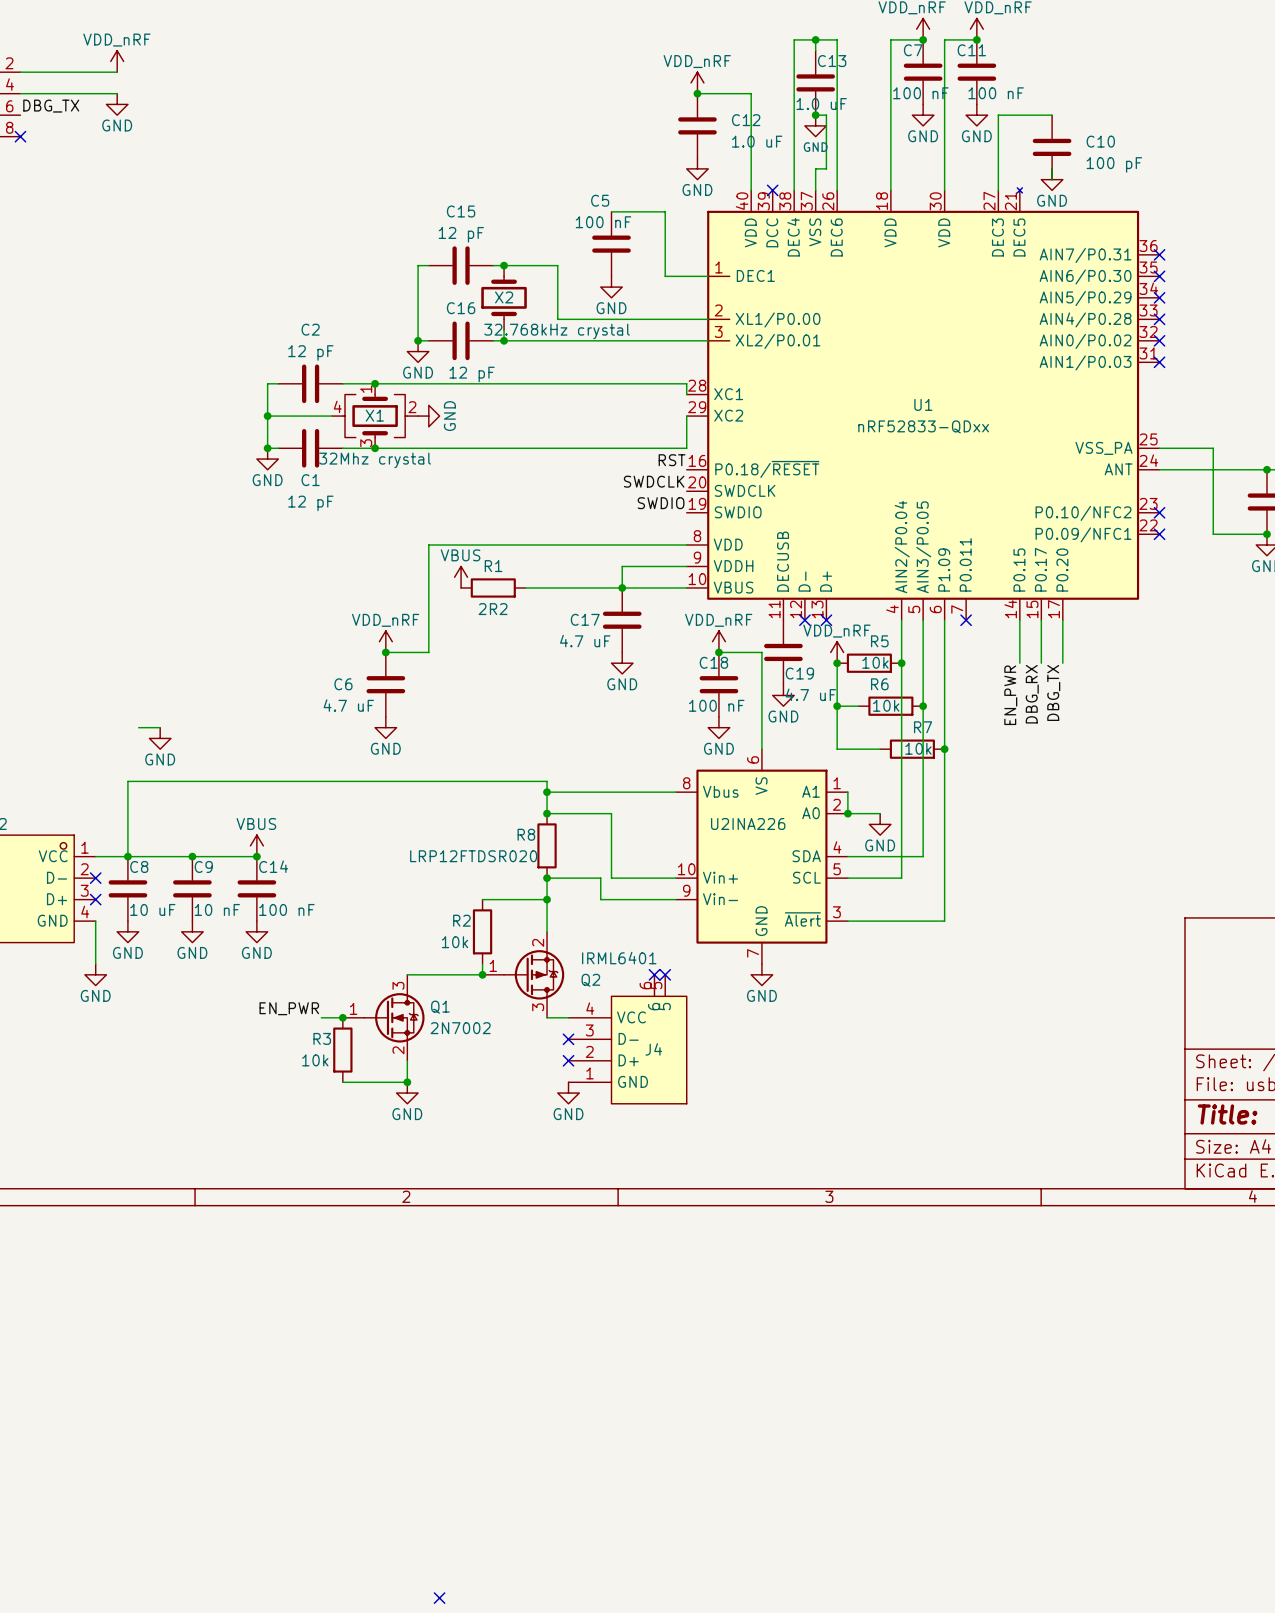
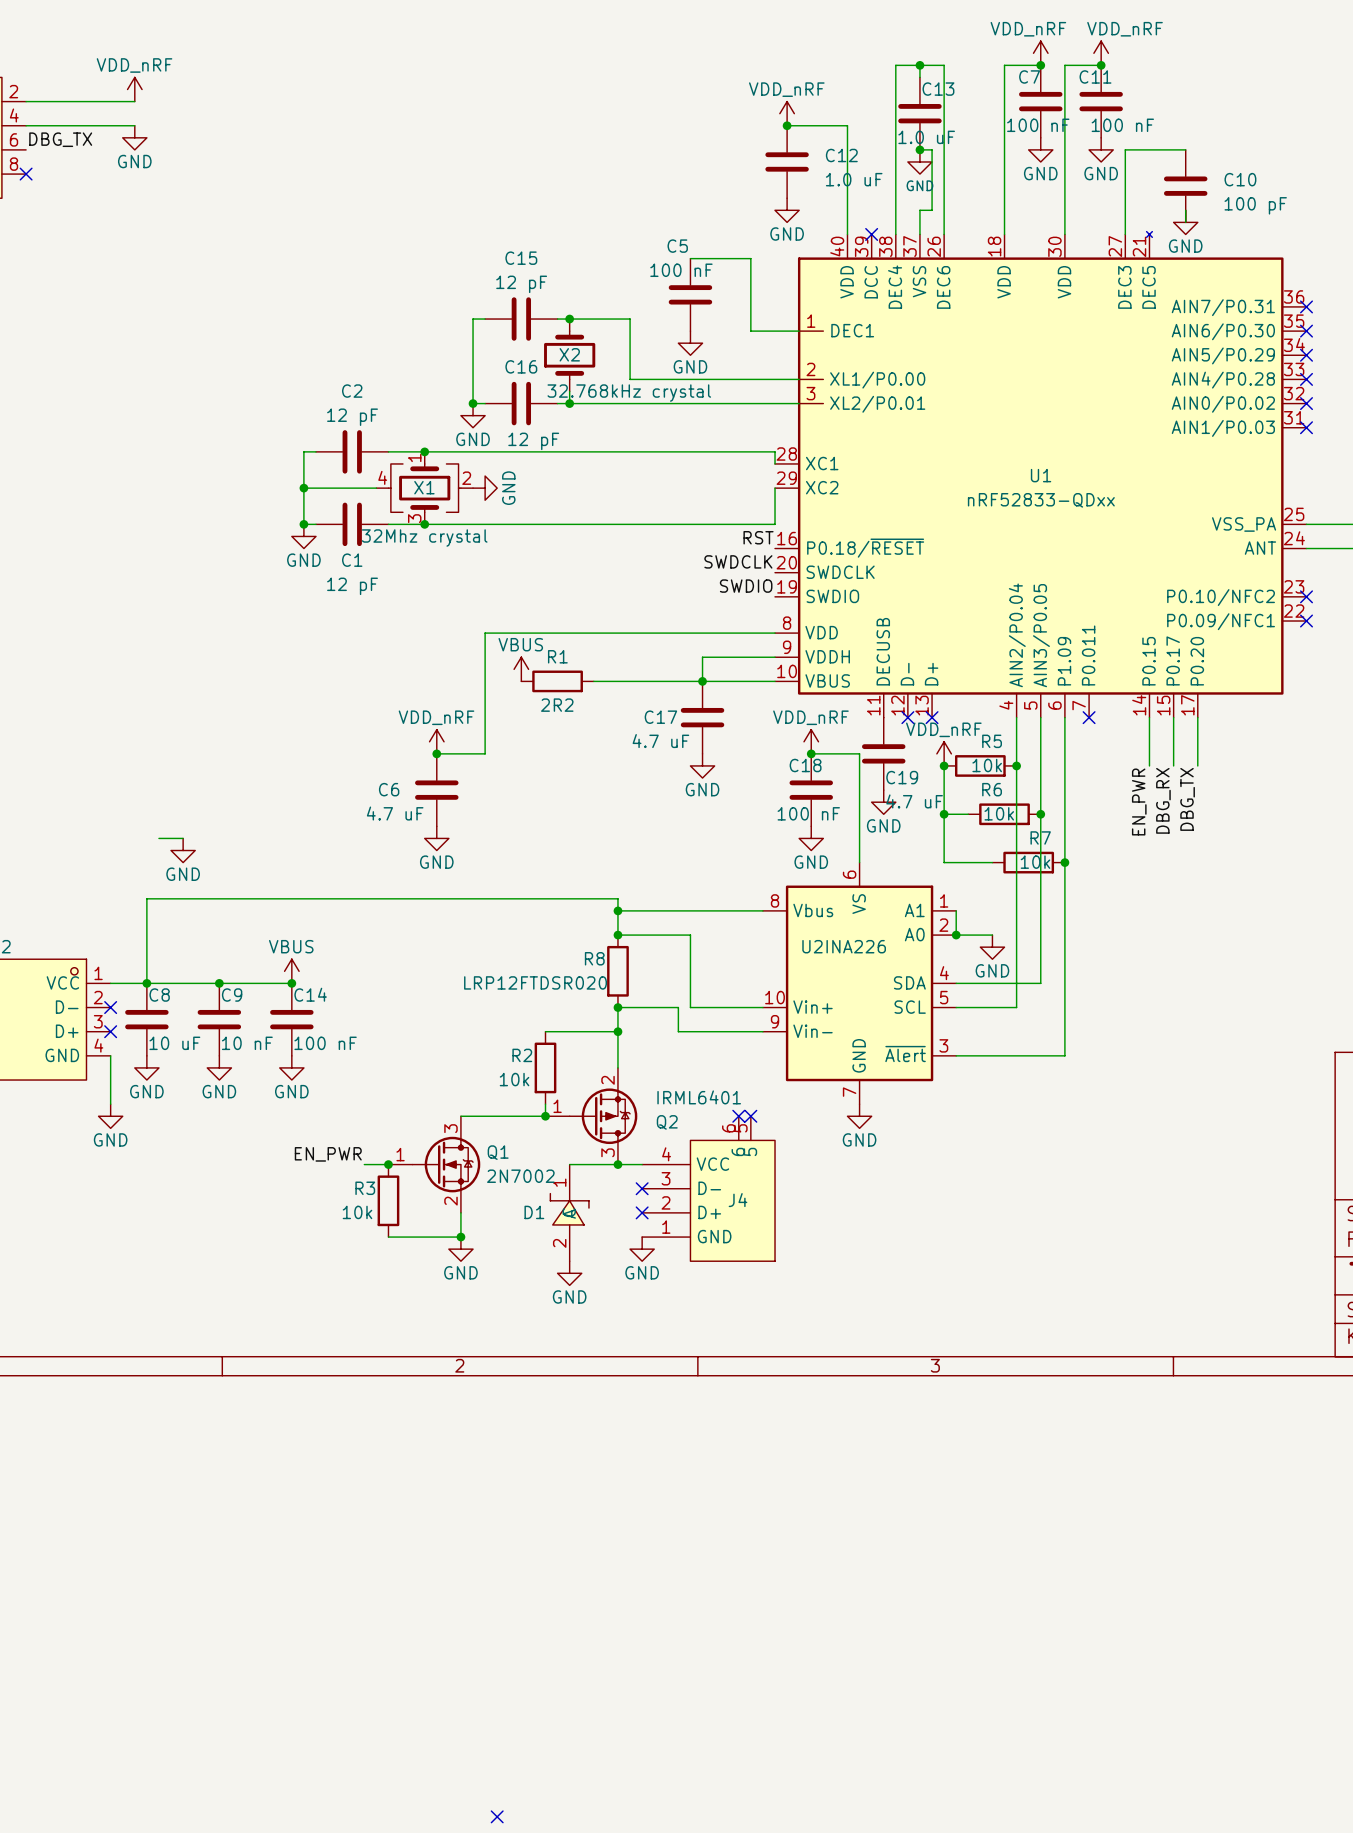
wire: none -> (569, 1164) (617, 1164)
junction: none -> (617, 1164)
D1: none -> (569, 1212)
power symbol: none -> GND (569, 1273)

